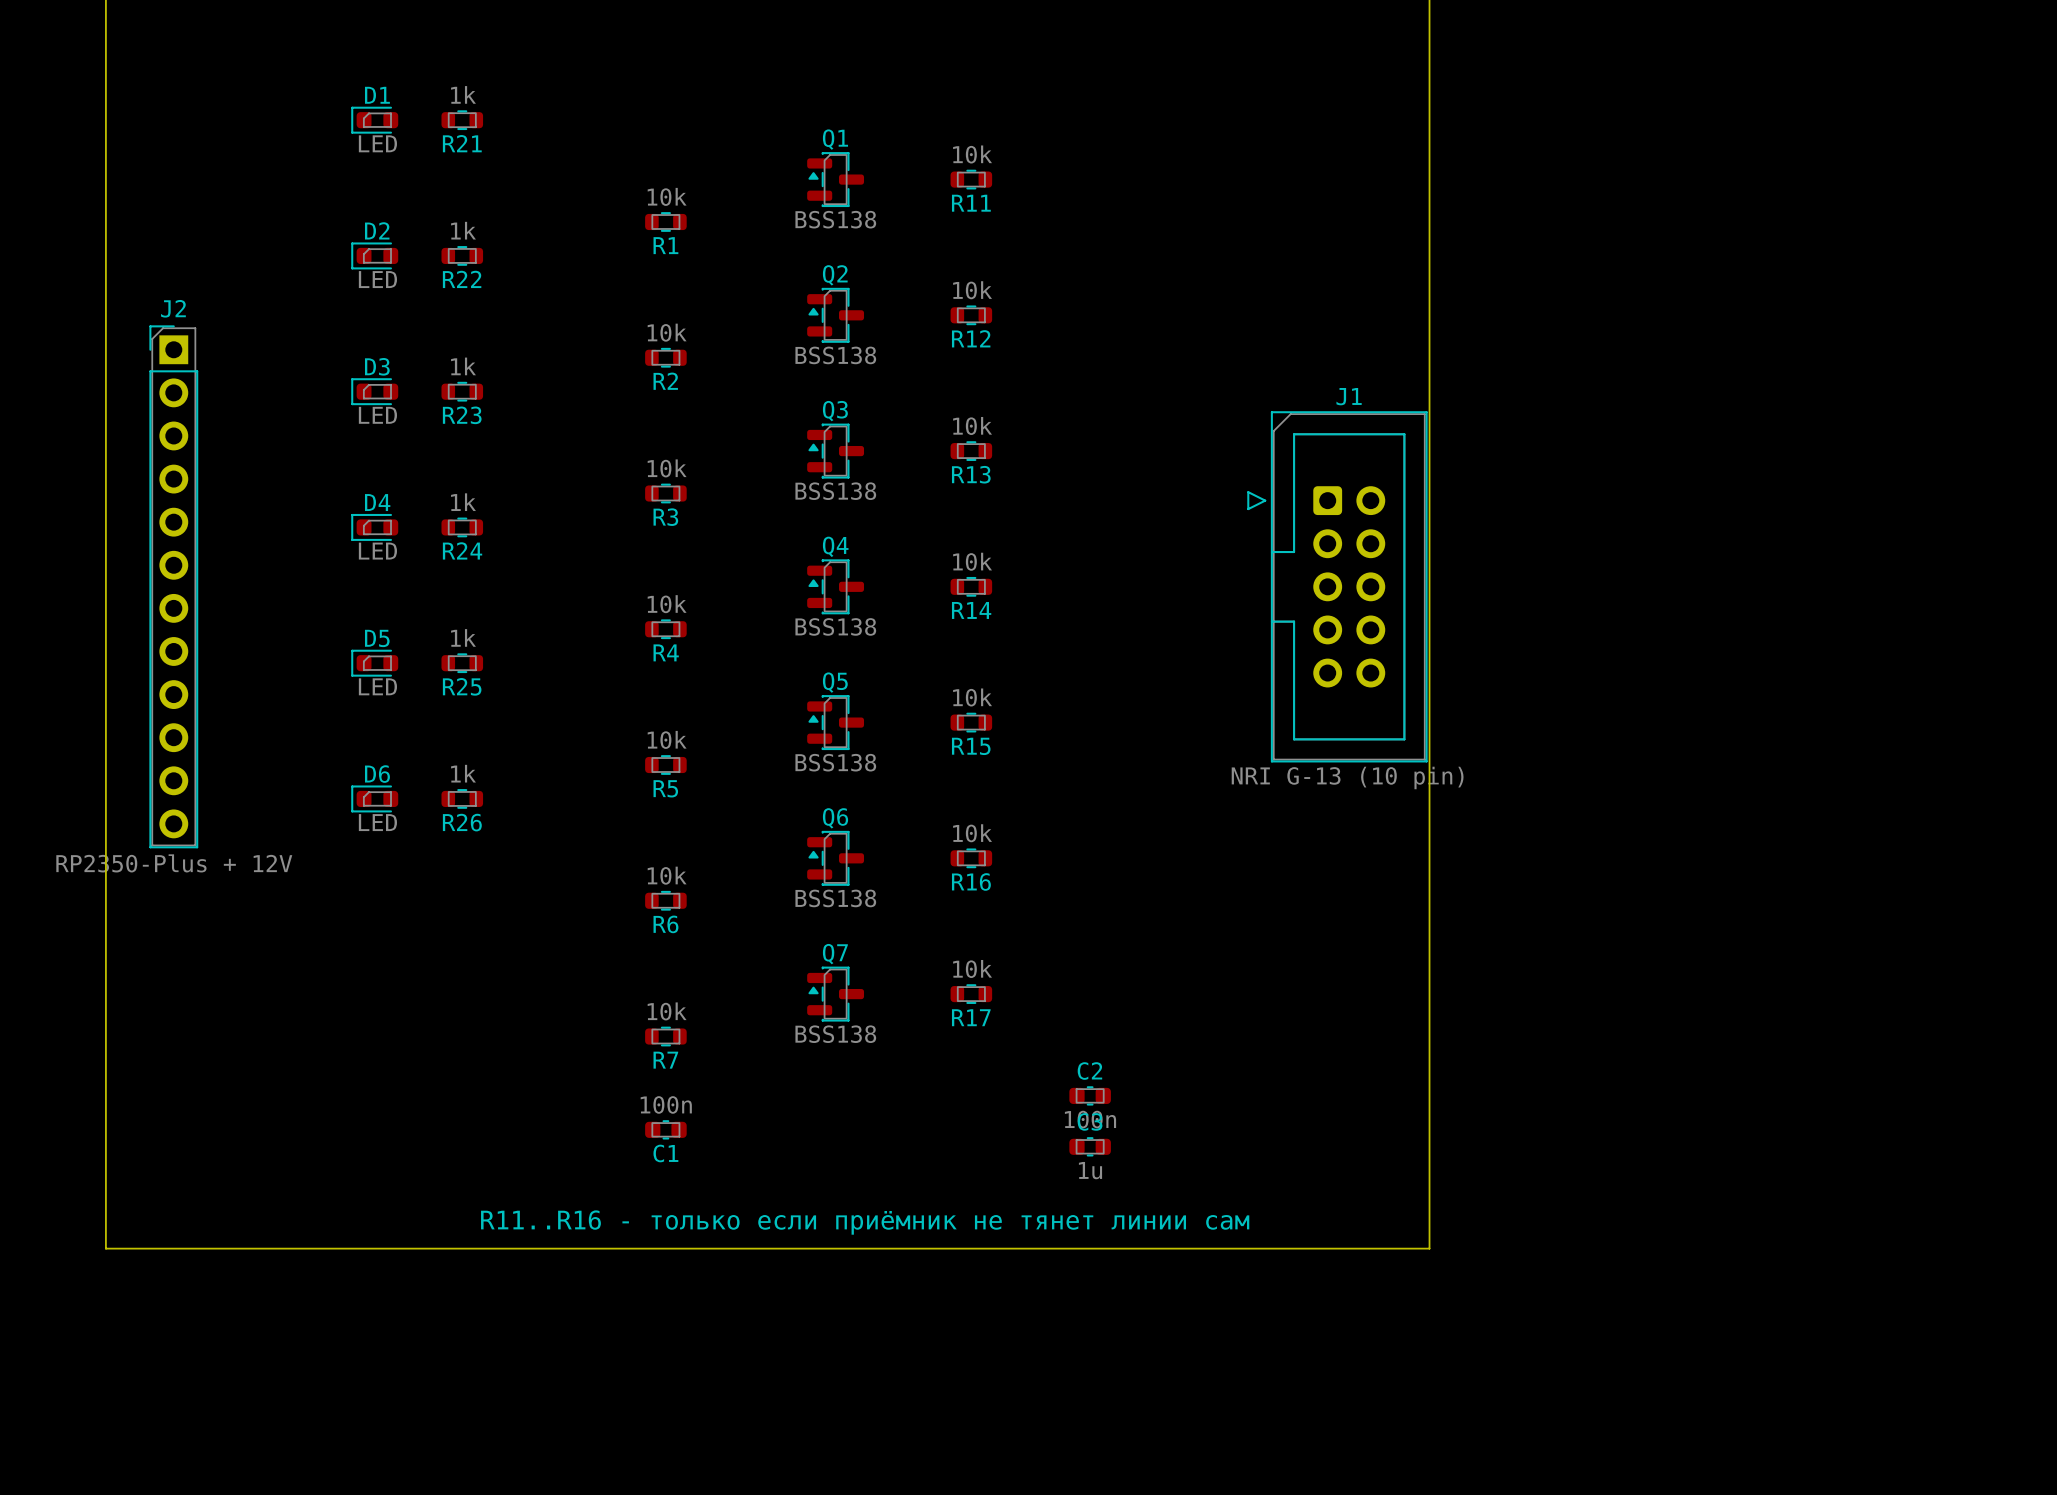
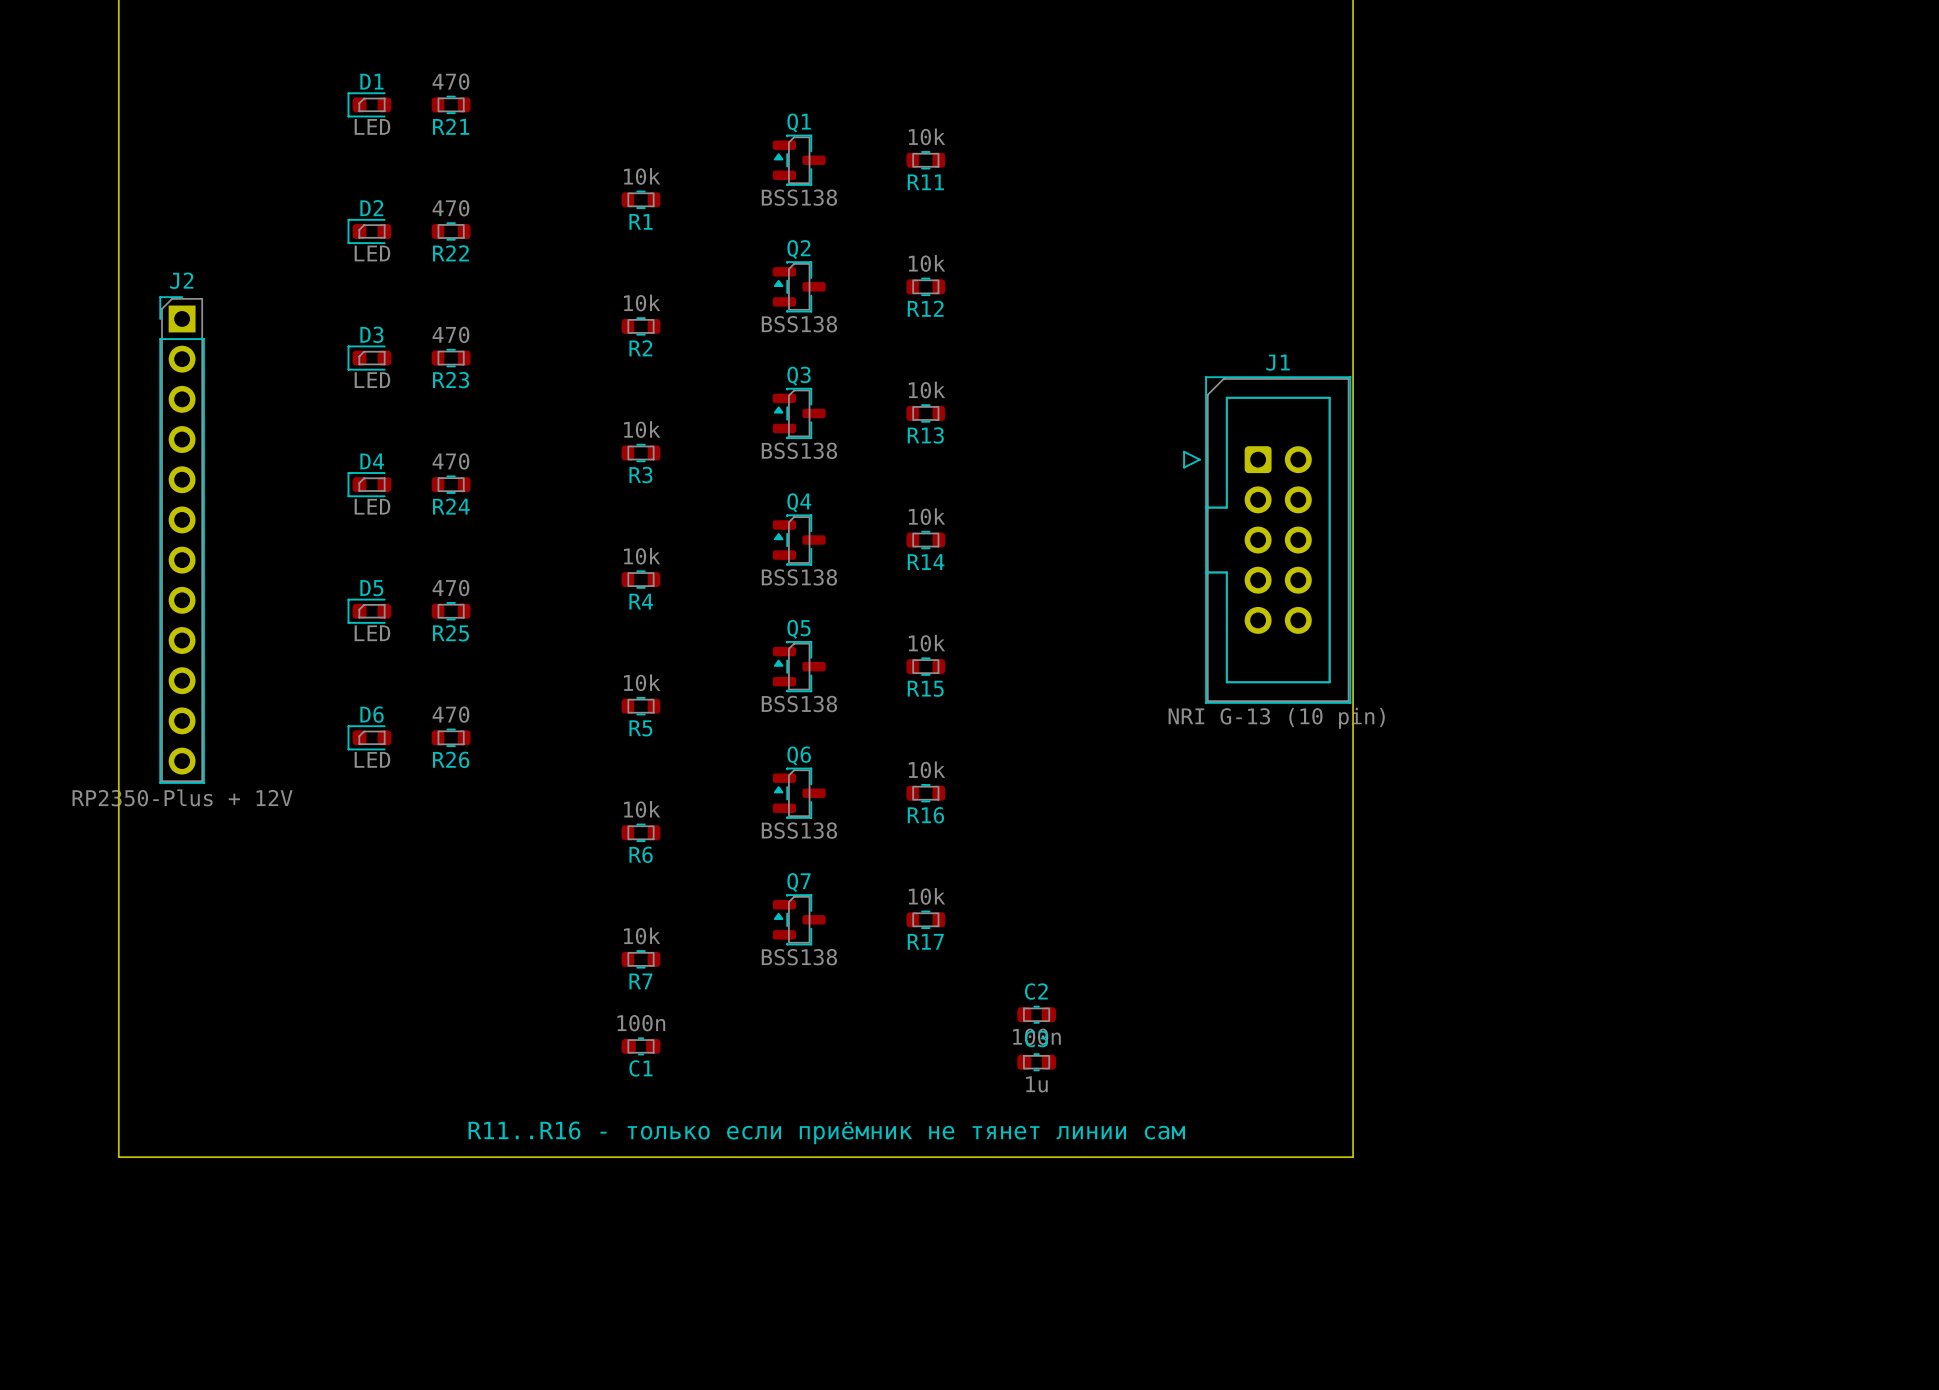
R21 value: 1k (463, 94) -> 470 (450, 81)
R22 value: 1k (463, 230) -> 470 (450, 208)
R23 value: 1k (463, 366) -> 470 (450, 334)
R24 value: 1k (463, 502) -> 470 (450, 461)
R25 value: 1k (463, 637) -> 470 (450, 588)
R26 value: 1k (463, 773) -> 470 (450, 714)

